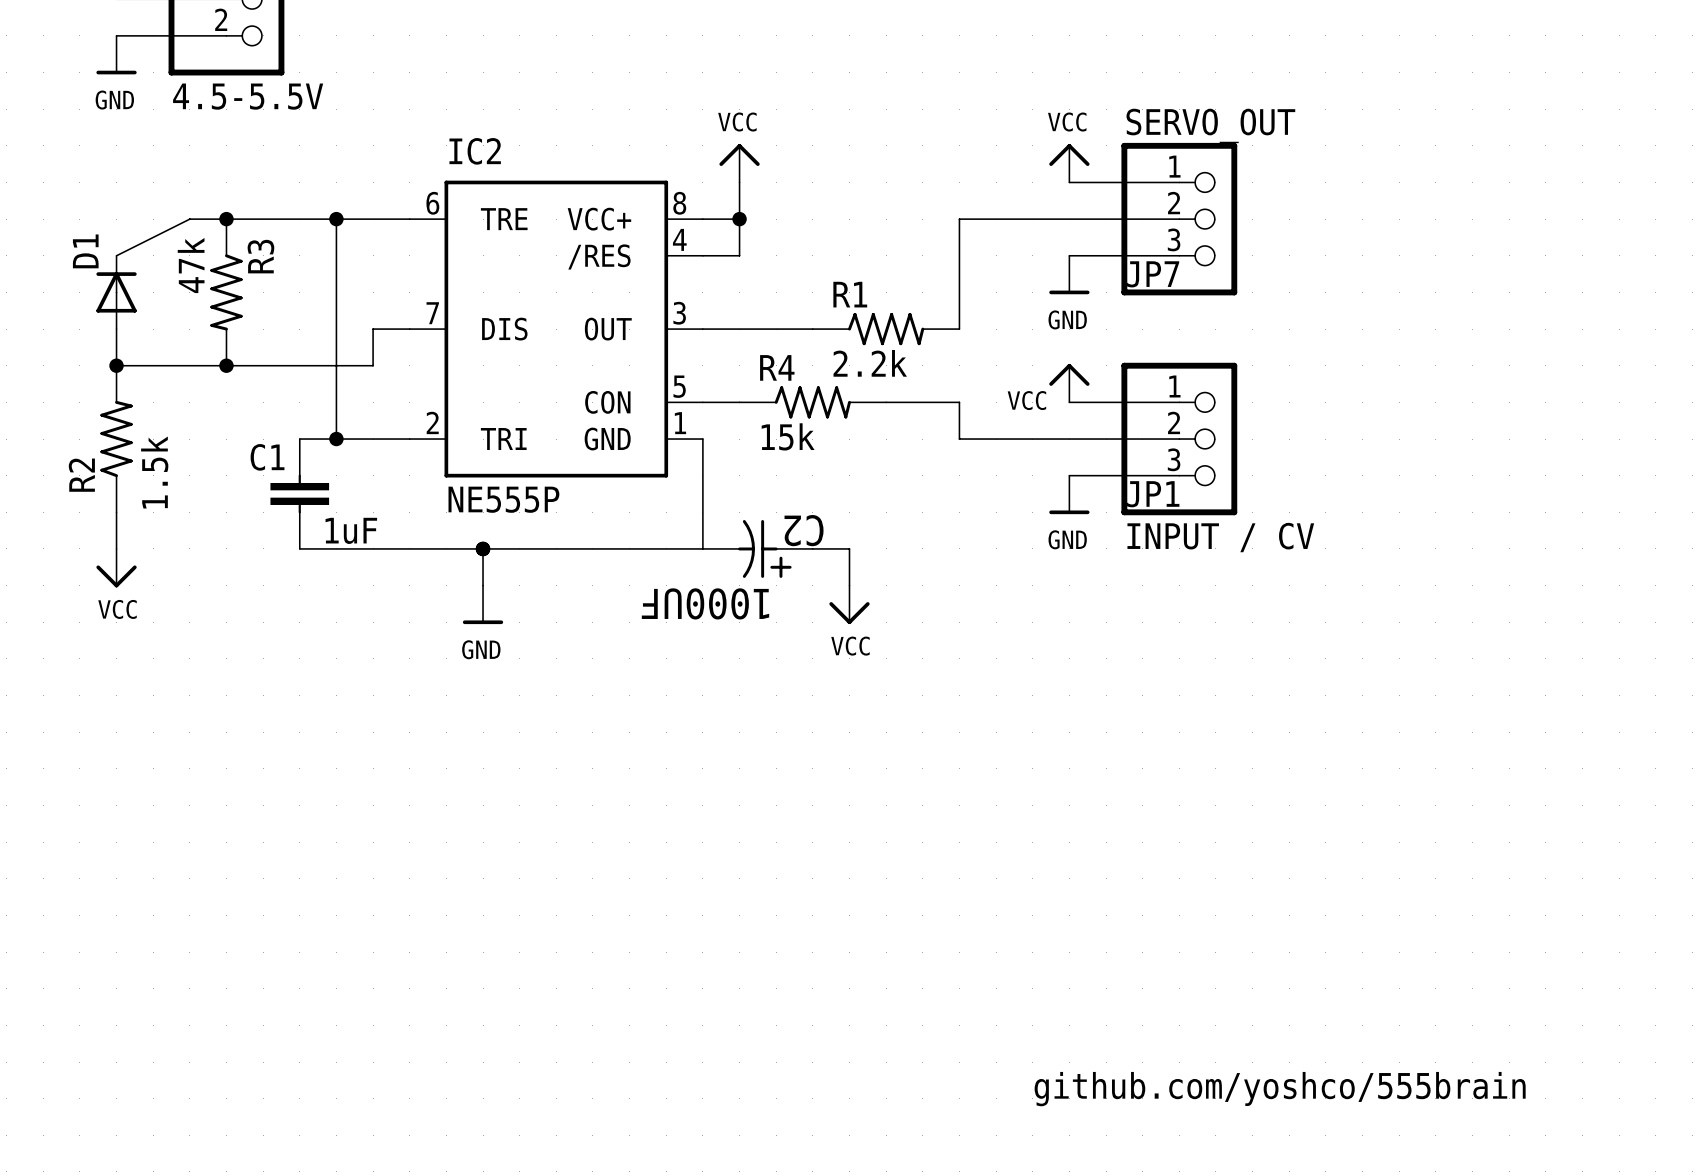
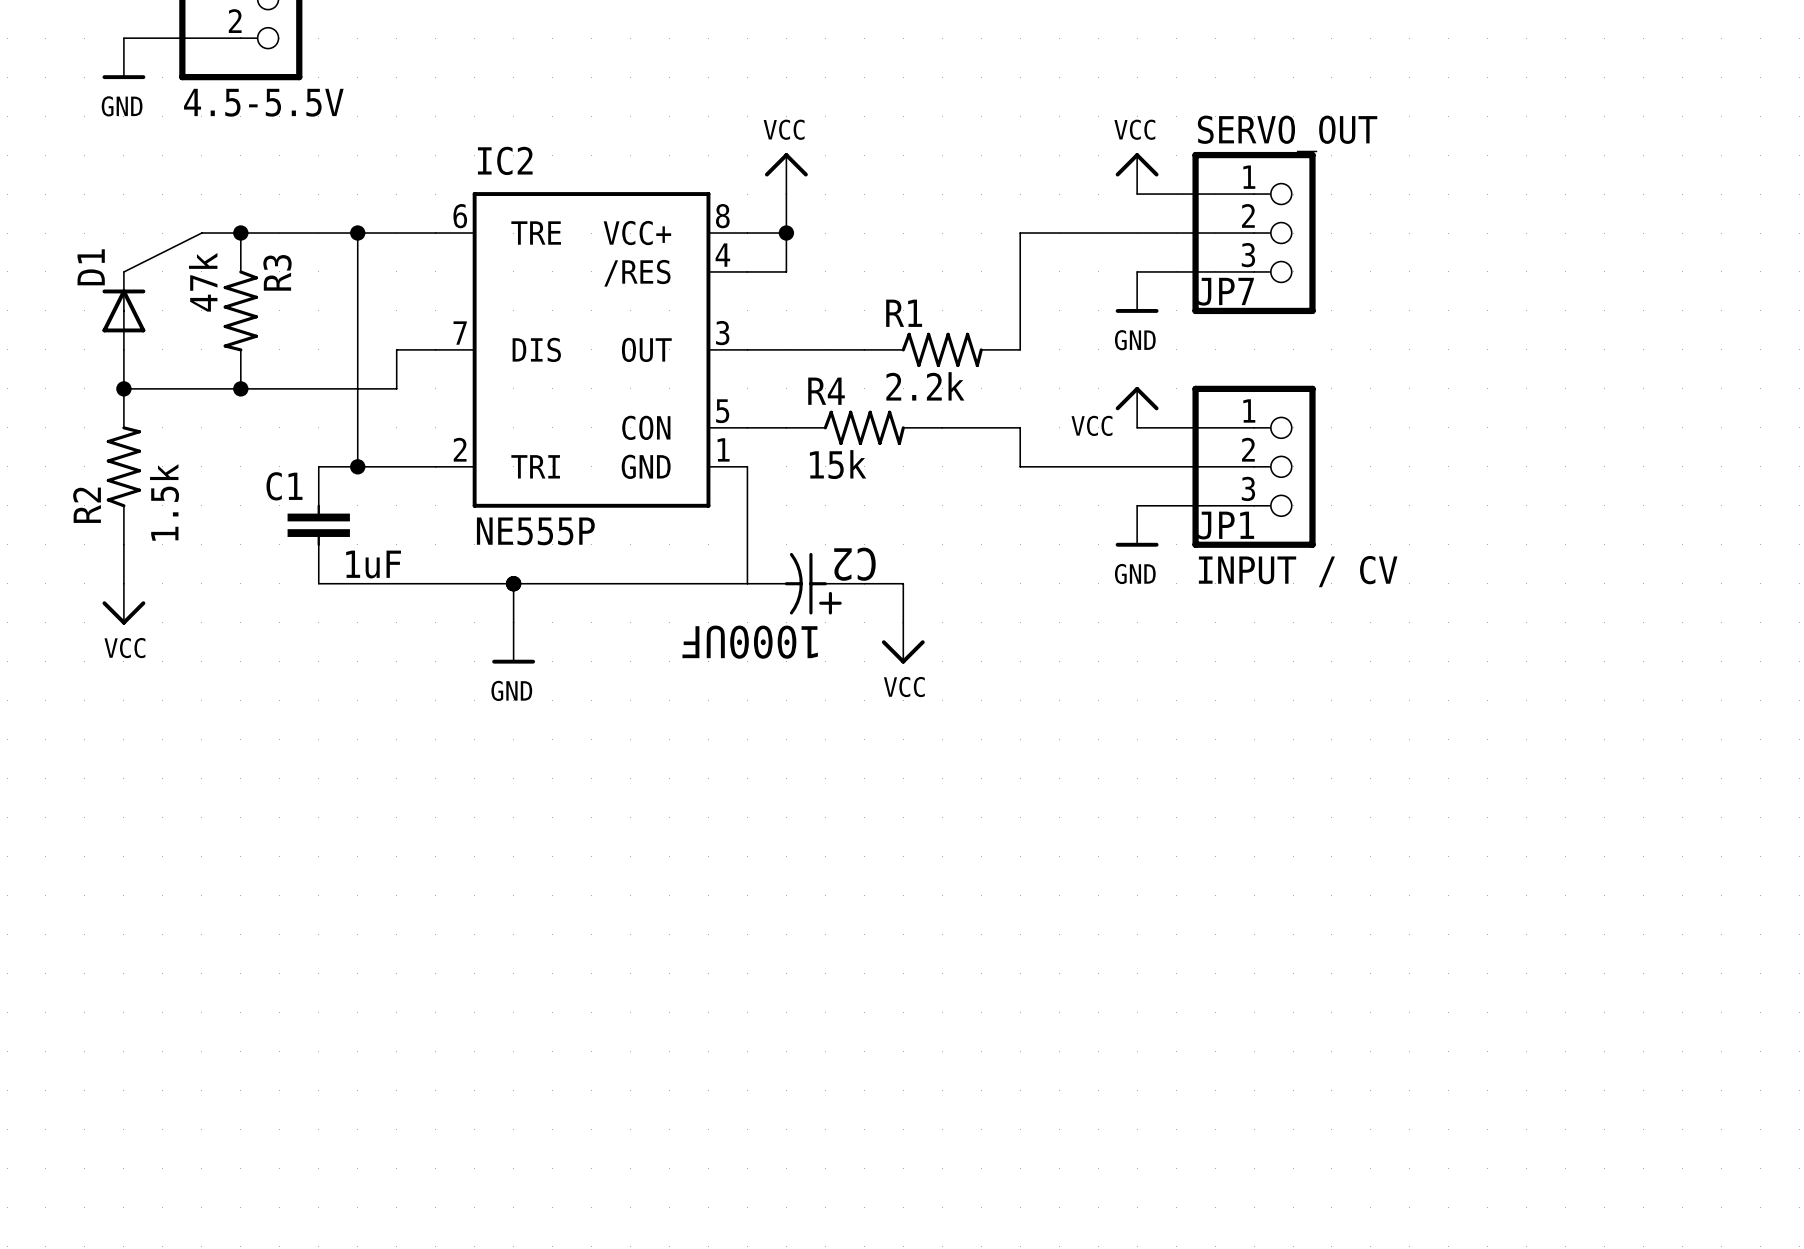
text: github.com/yoshco/555brain (1280, 1089) -> none

